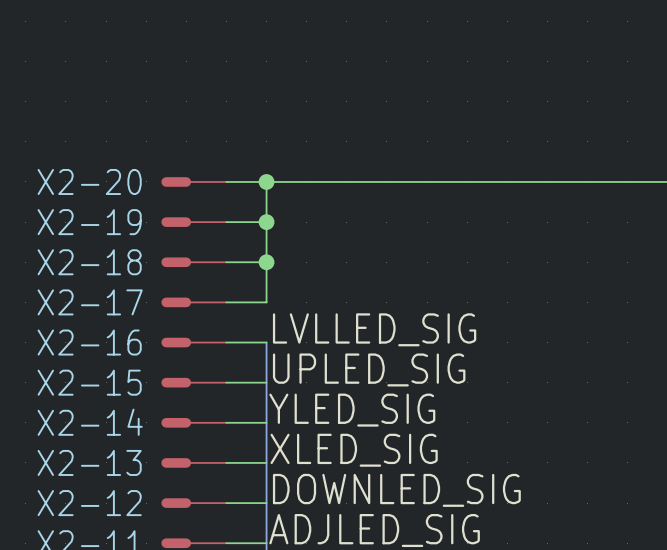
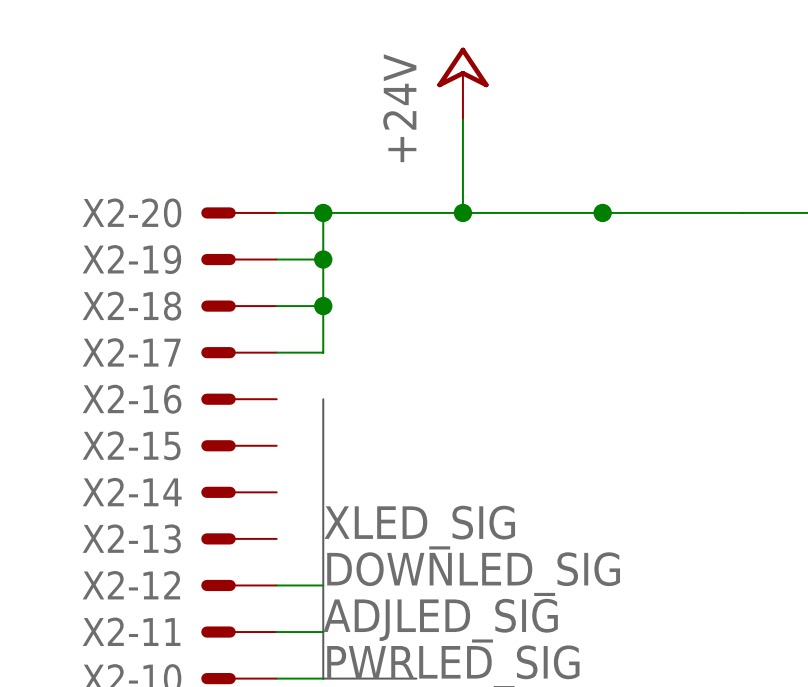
power symbol: none -> +24V (462, 83)
wire: none -> (462, 119) (462, 212)
junction: none -> (462, 212)
junction: none -> (602, 212)
label: LVLLED_SIG (374, 329) -> none
wire: (226, 342) (266, 342) -> none
label: UPLED_SIG (369, 369) -> none
wire: (226, 382) (266, 382) -> none
label: YLED_SIG (352, 410) -> none
wire: (226, 422) (266, 422) -> none
wire: (226, 462) (266, 462) -> none

